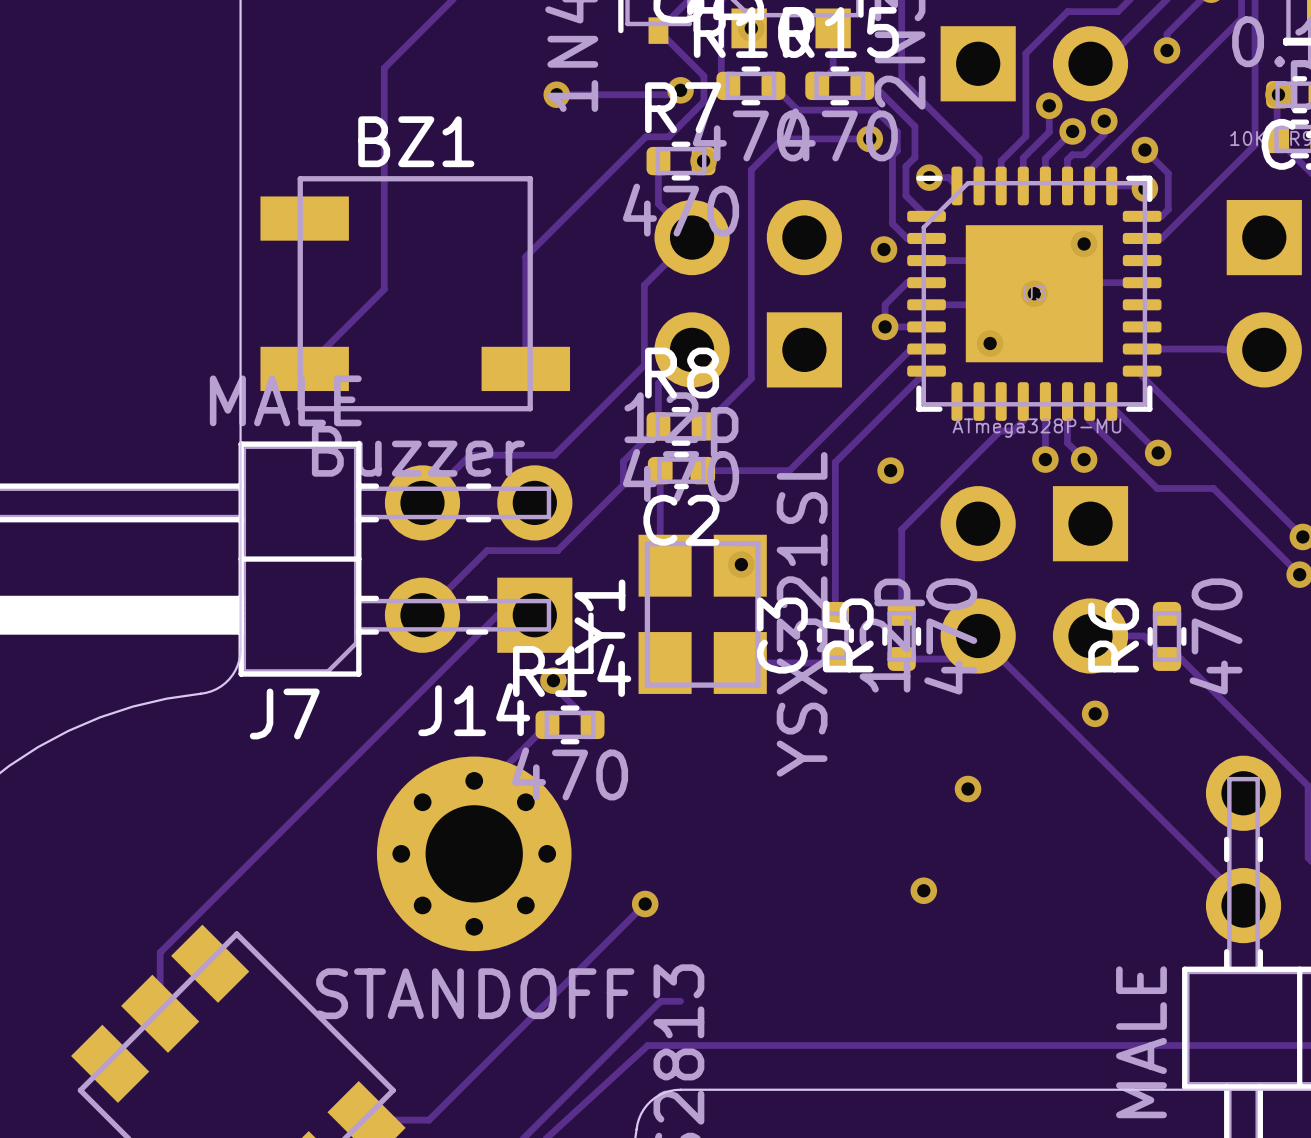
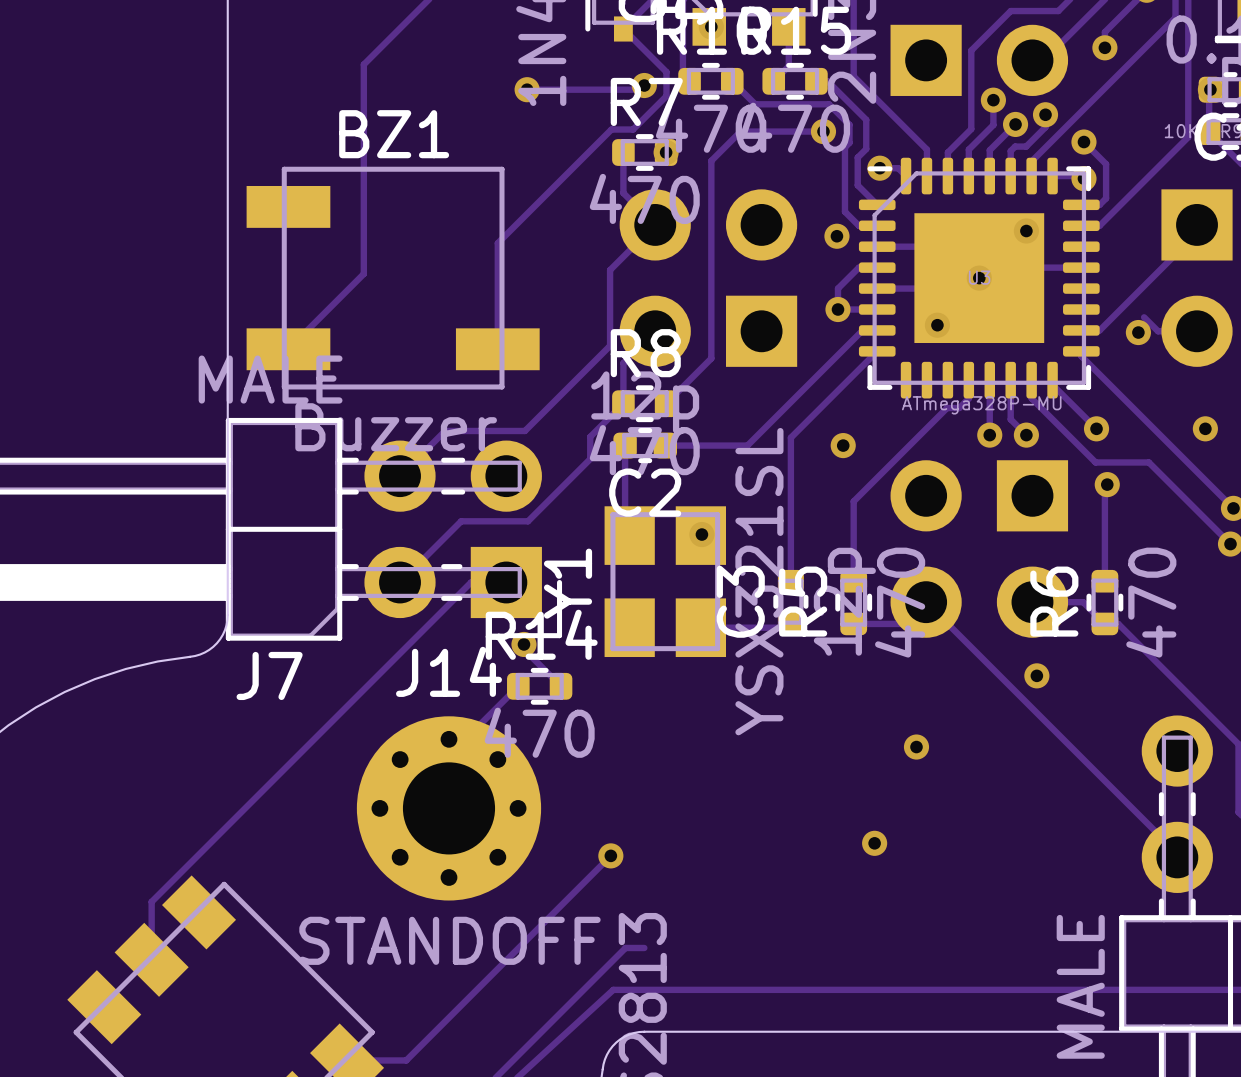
track: none -> (1197, 224) (1197, 233) (1099, 330)
track: (1161, 349) (1222, 349) -> (1144, 317) (1157, 330)
via: none -> (1138, 332)
via: none -> (1205, 428)
track: none -> (1107, 484) (1104, 486) (1104, 581)
via: none -> (1107, 484)

